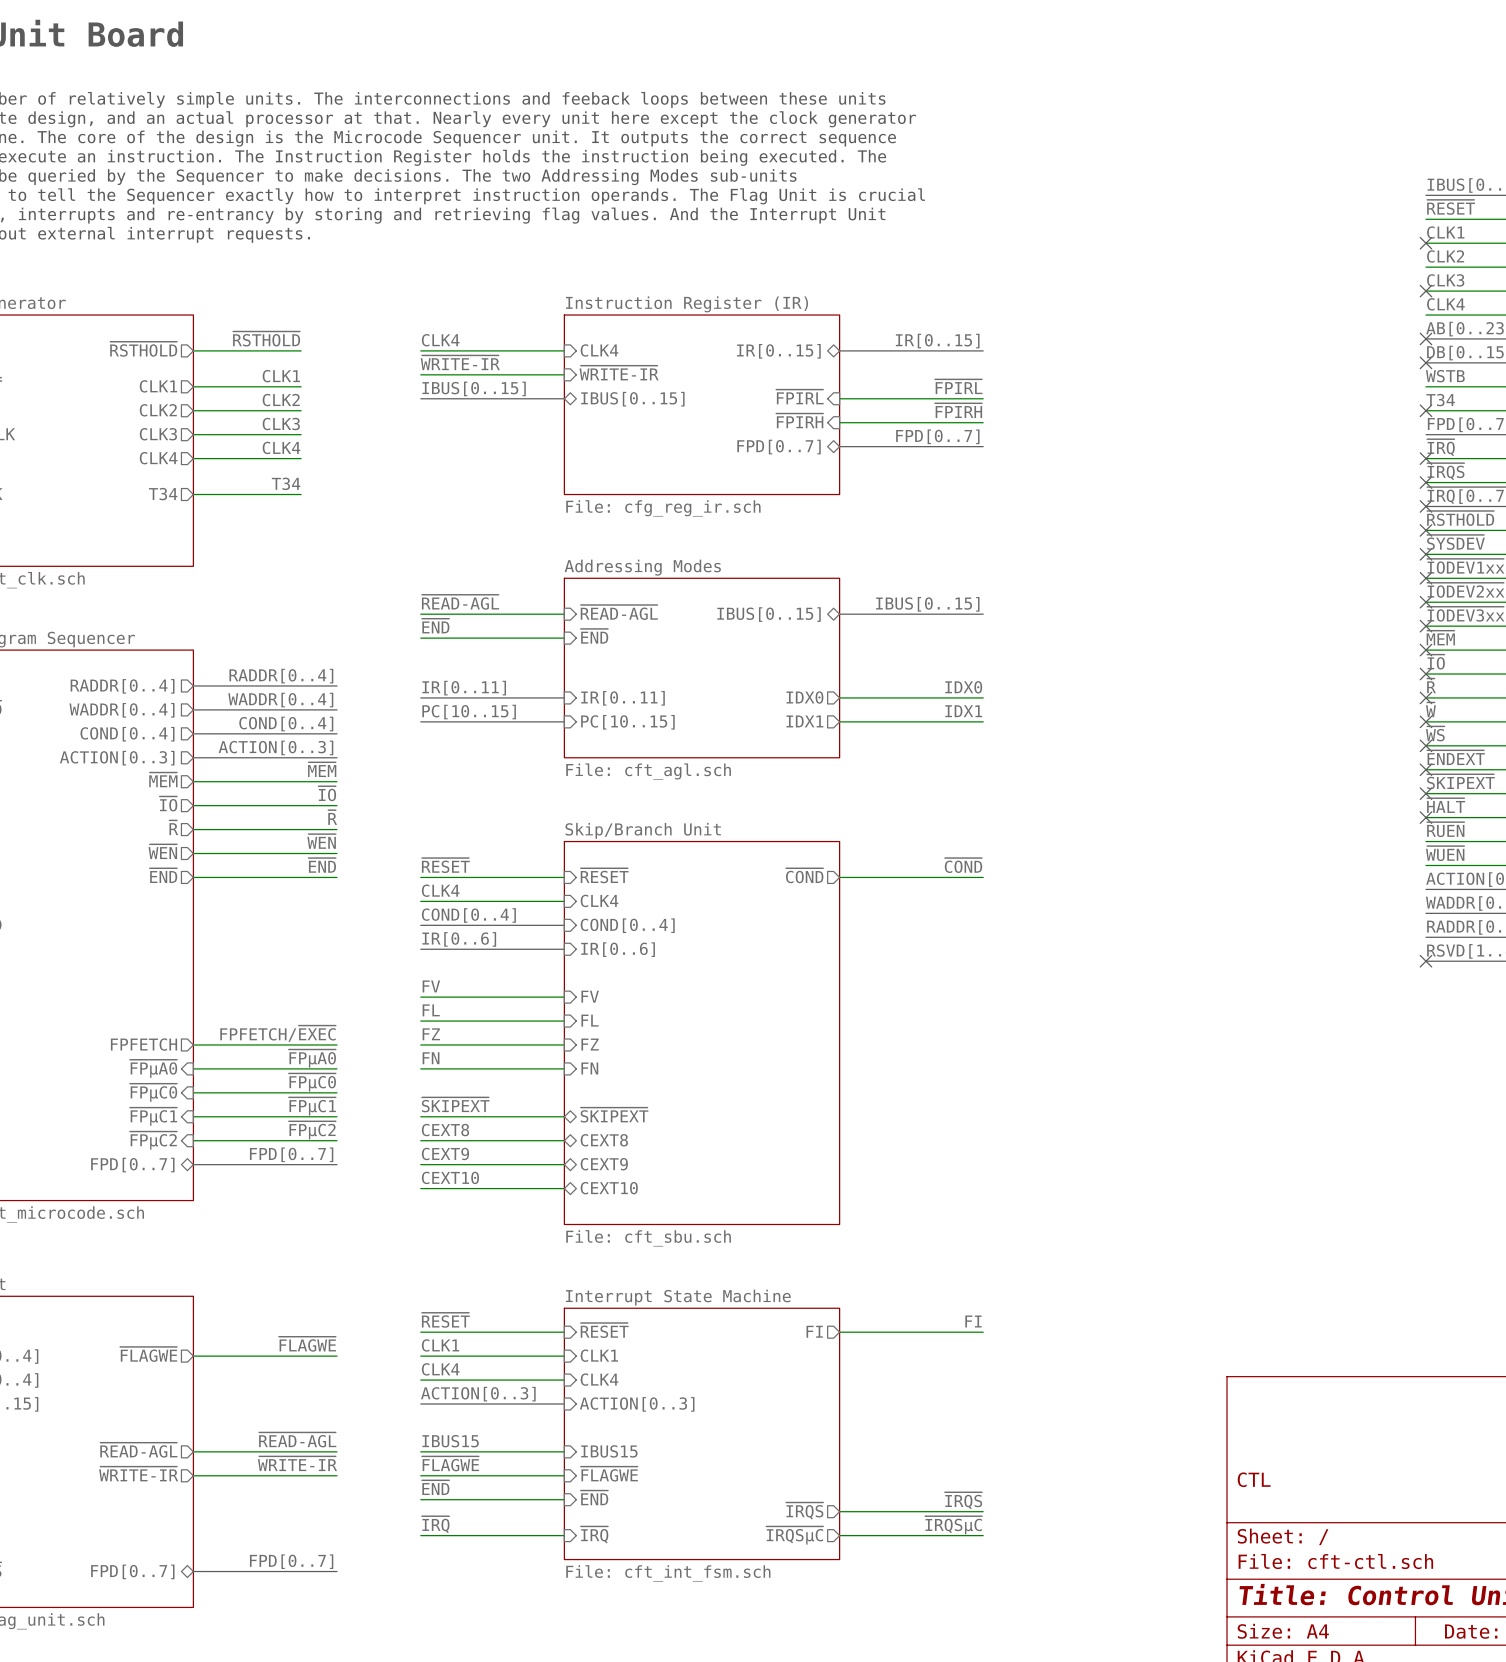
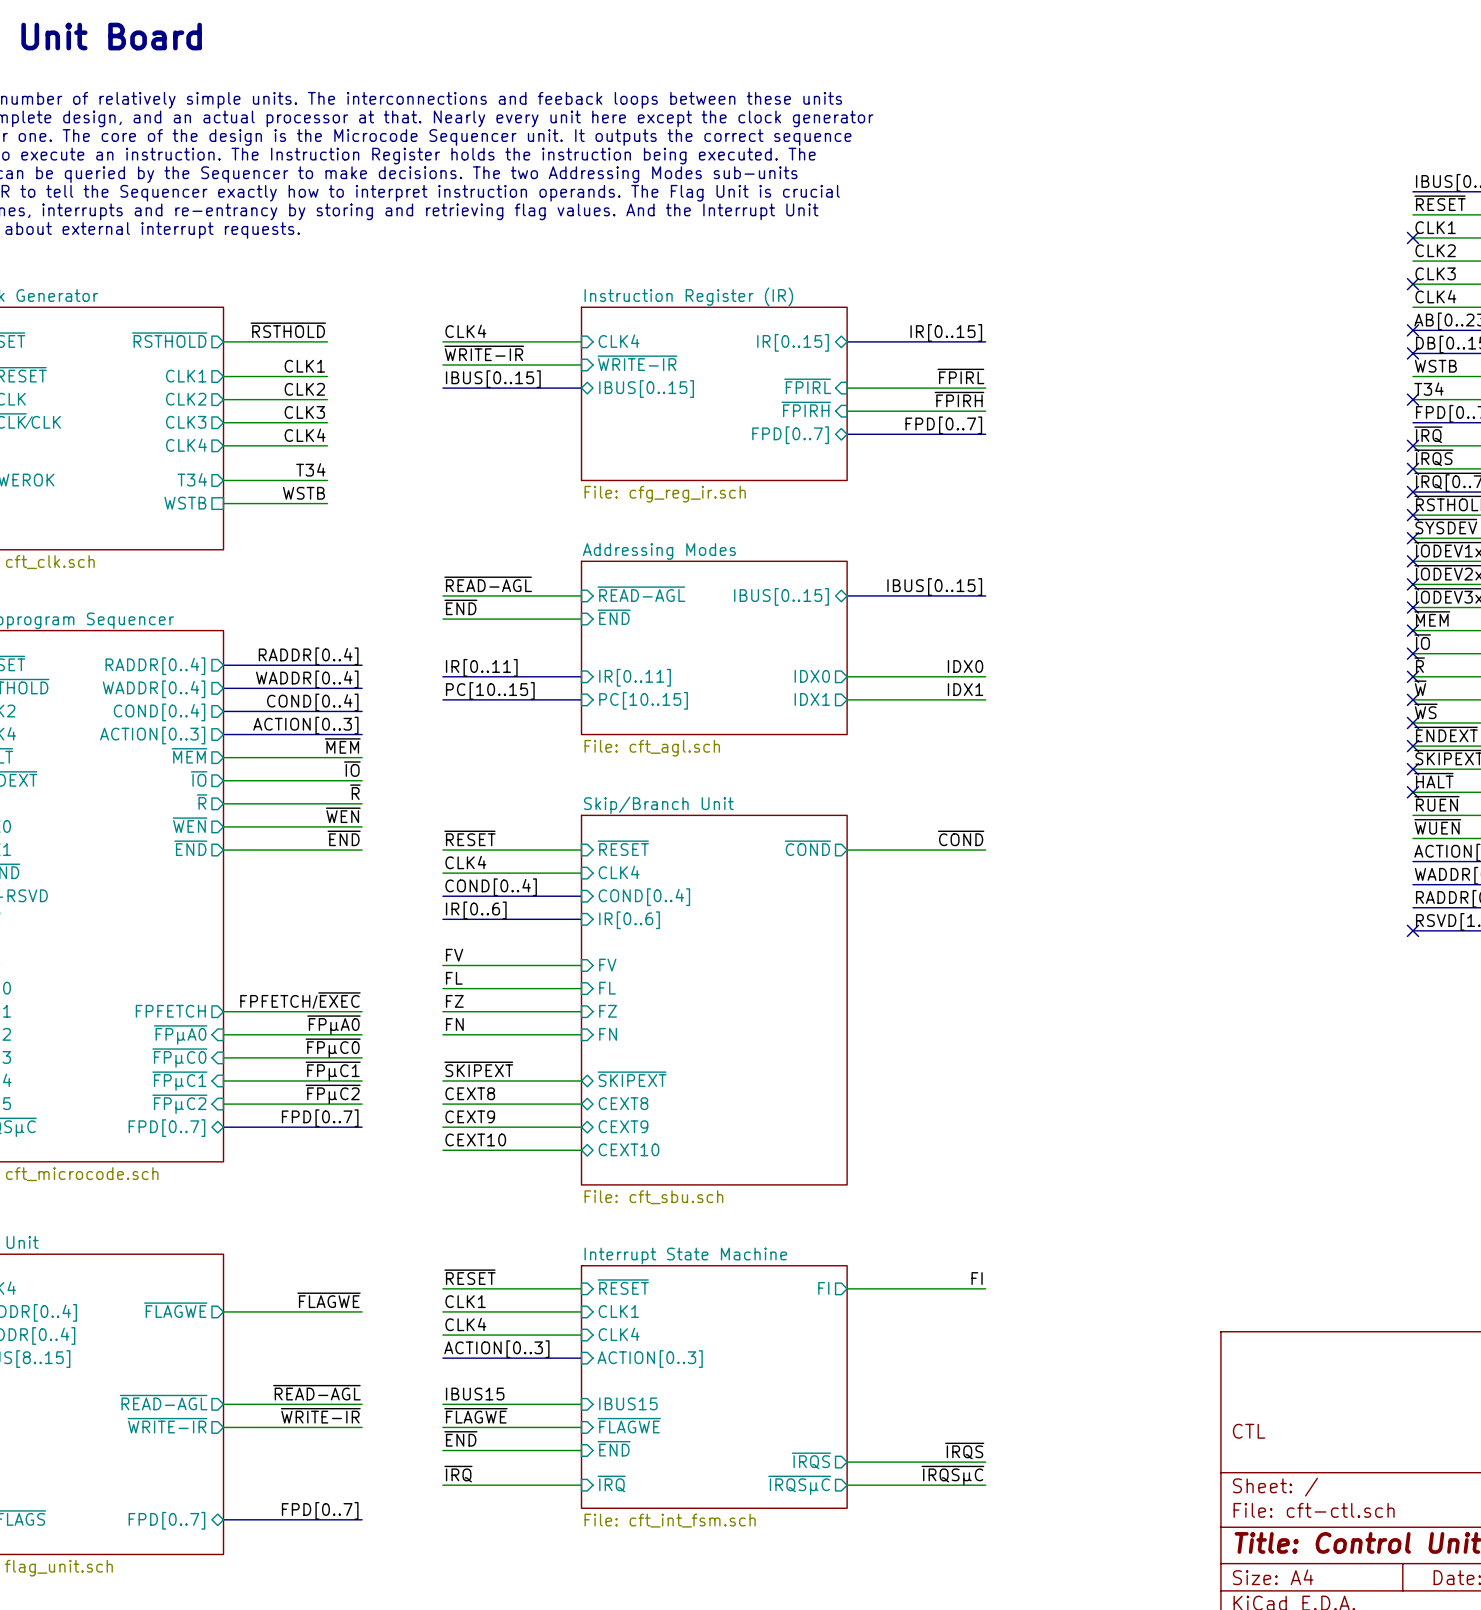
label: none -> WSTB (303, 493)
sheet pin: none -> WSTB (185, 503)
wire: none -> (223, 503) (327, 503)

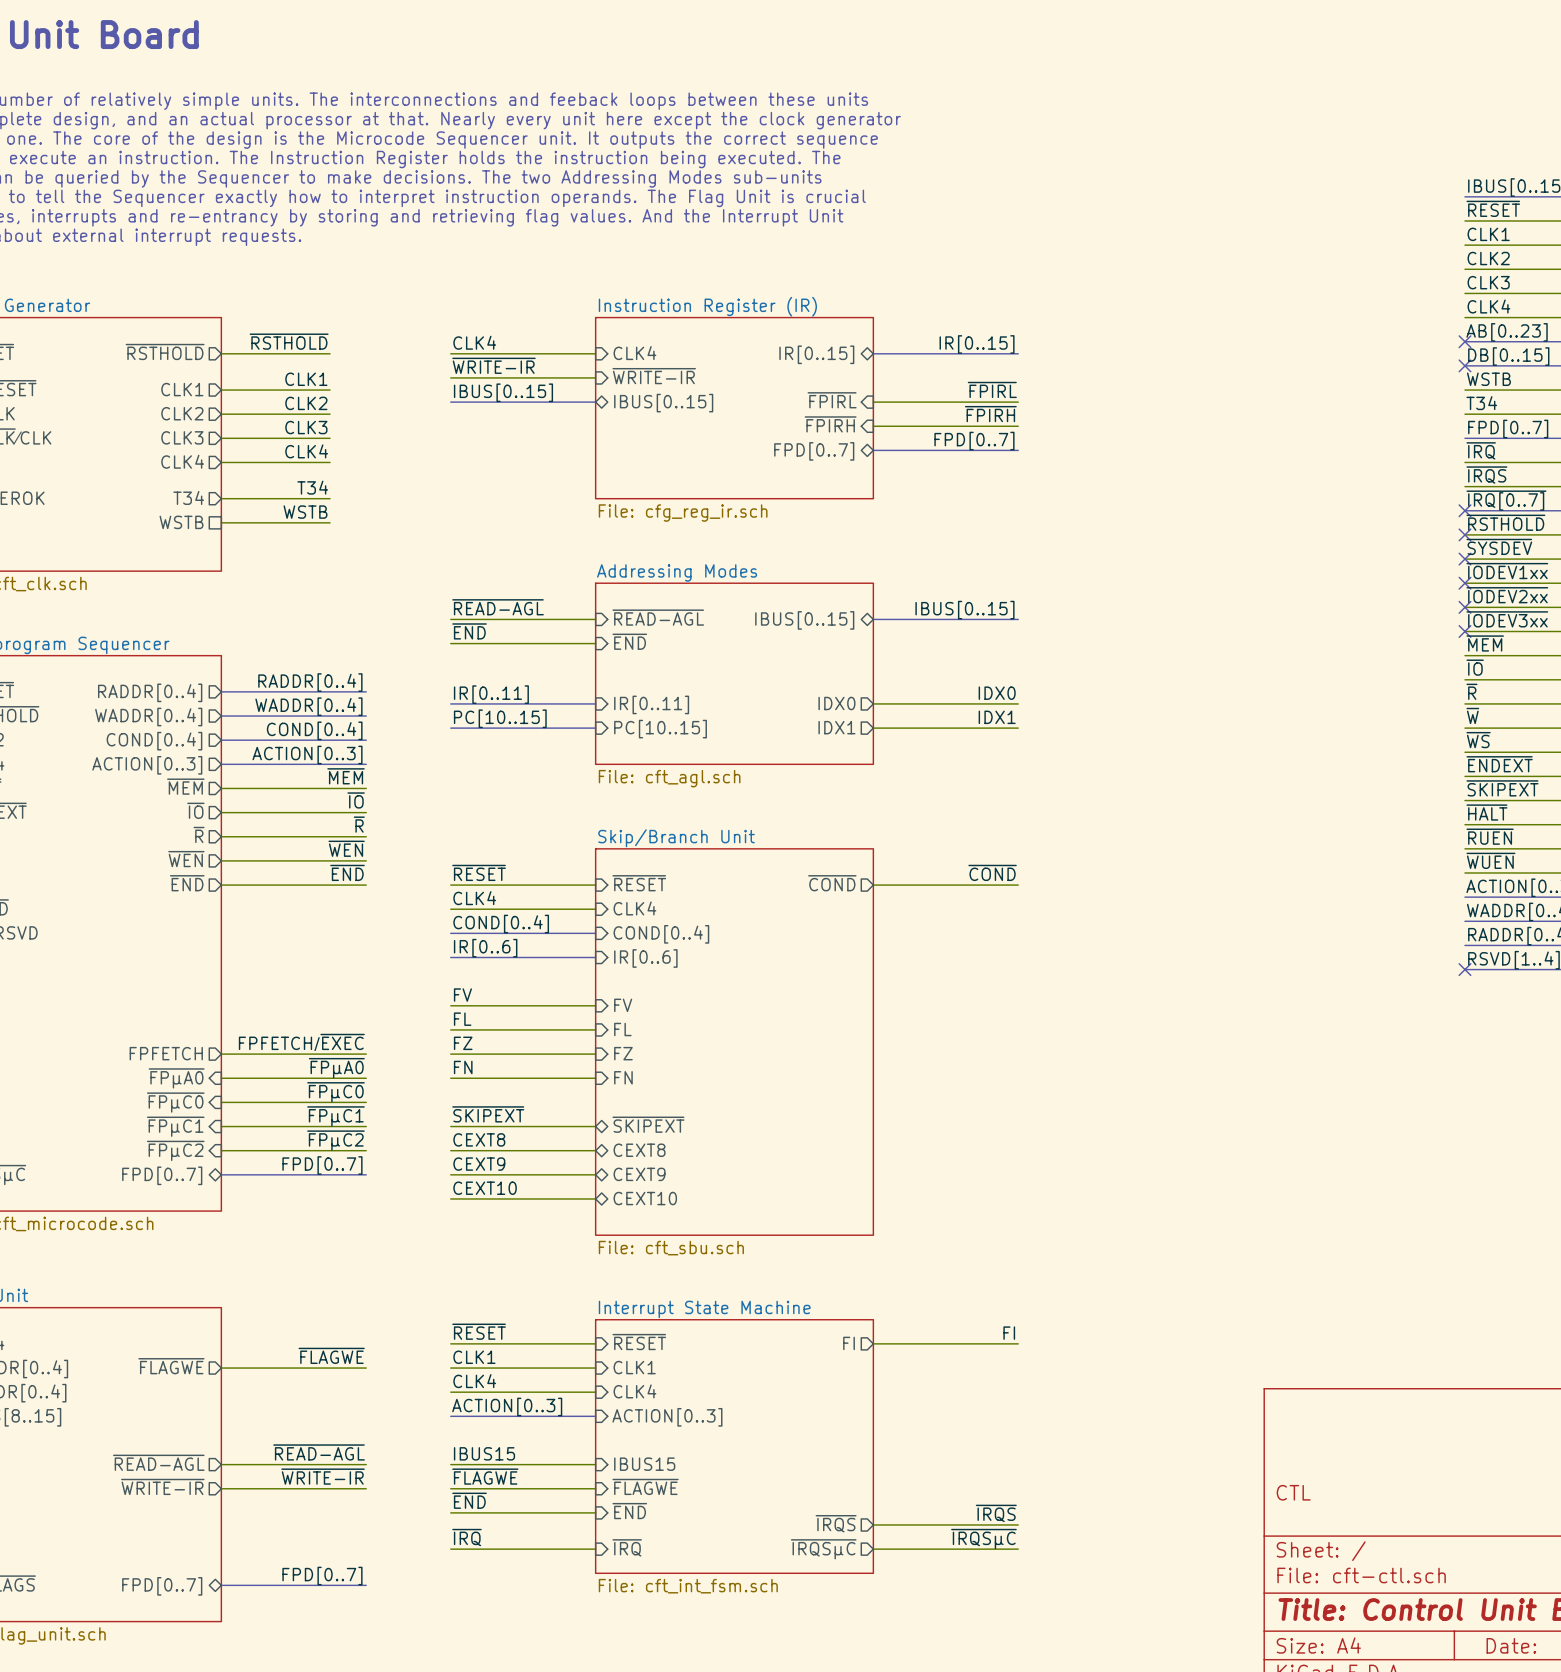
no-connect mark: (1412, 237) -> none
no-connect mark: (1412, 284) -> none
no-connect mark: (1412, 399) -> none
no-connect mark: (1412, 445) -> none
no-connect mark: (1412, 468) -> none
no-connect mark: (1412, 630) -> none
no-connect mark: (1412, 653) -> none
no-connect mark: (1412, 676) -> none
no-connect mark: (1412, 699) -> none
no-connect mark: (1412, 722) -> none
no-connect mark: (1412, 746) -> none
no-connect mark: (1412, 769) -> none
no-connect mark: (1412, 792) -> none

